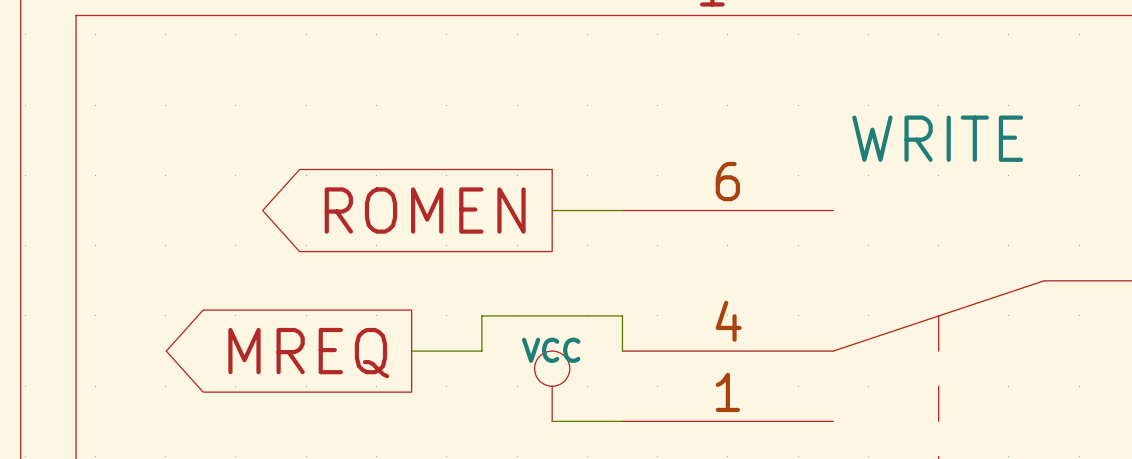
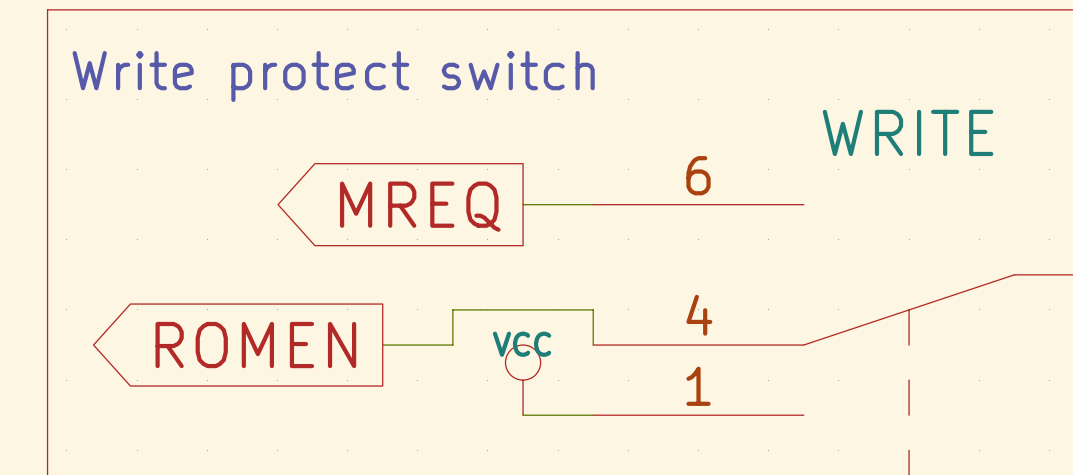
text: none -> Write protect switch (333, 76)
global label: ROMEN (425, 210) -> MREQ (420, 206)
global label: MREQ (308, 353) -> ROMEN (255, 345)

